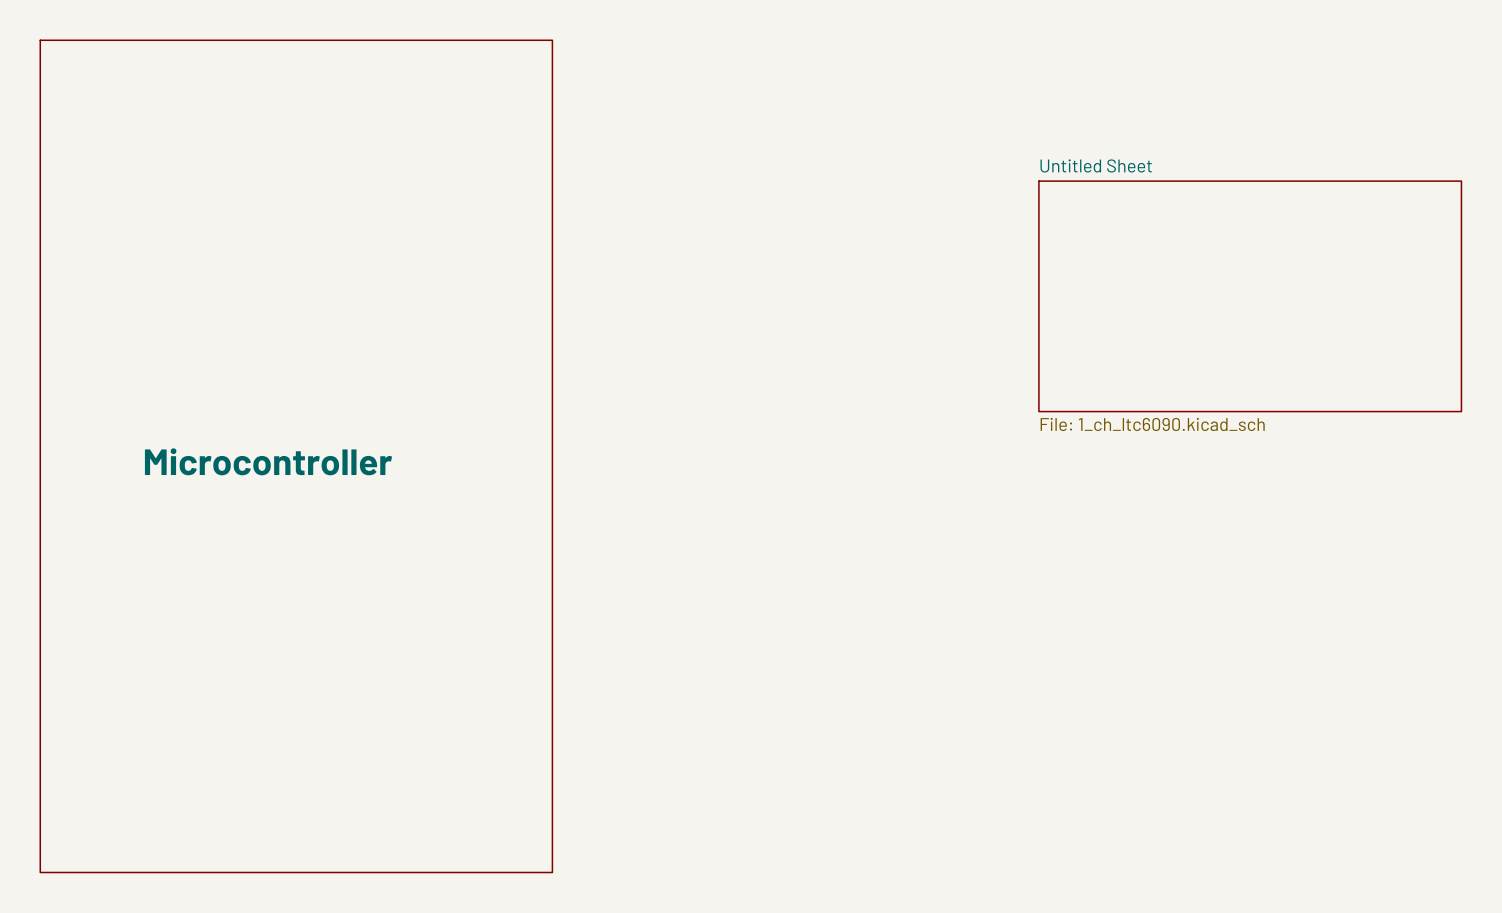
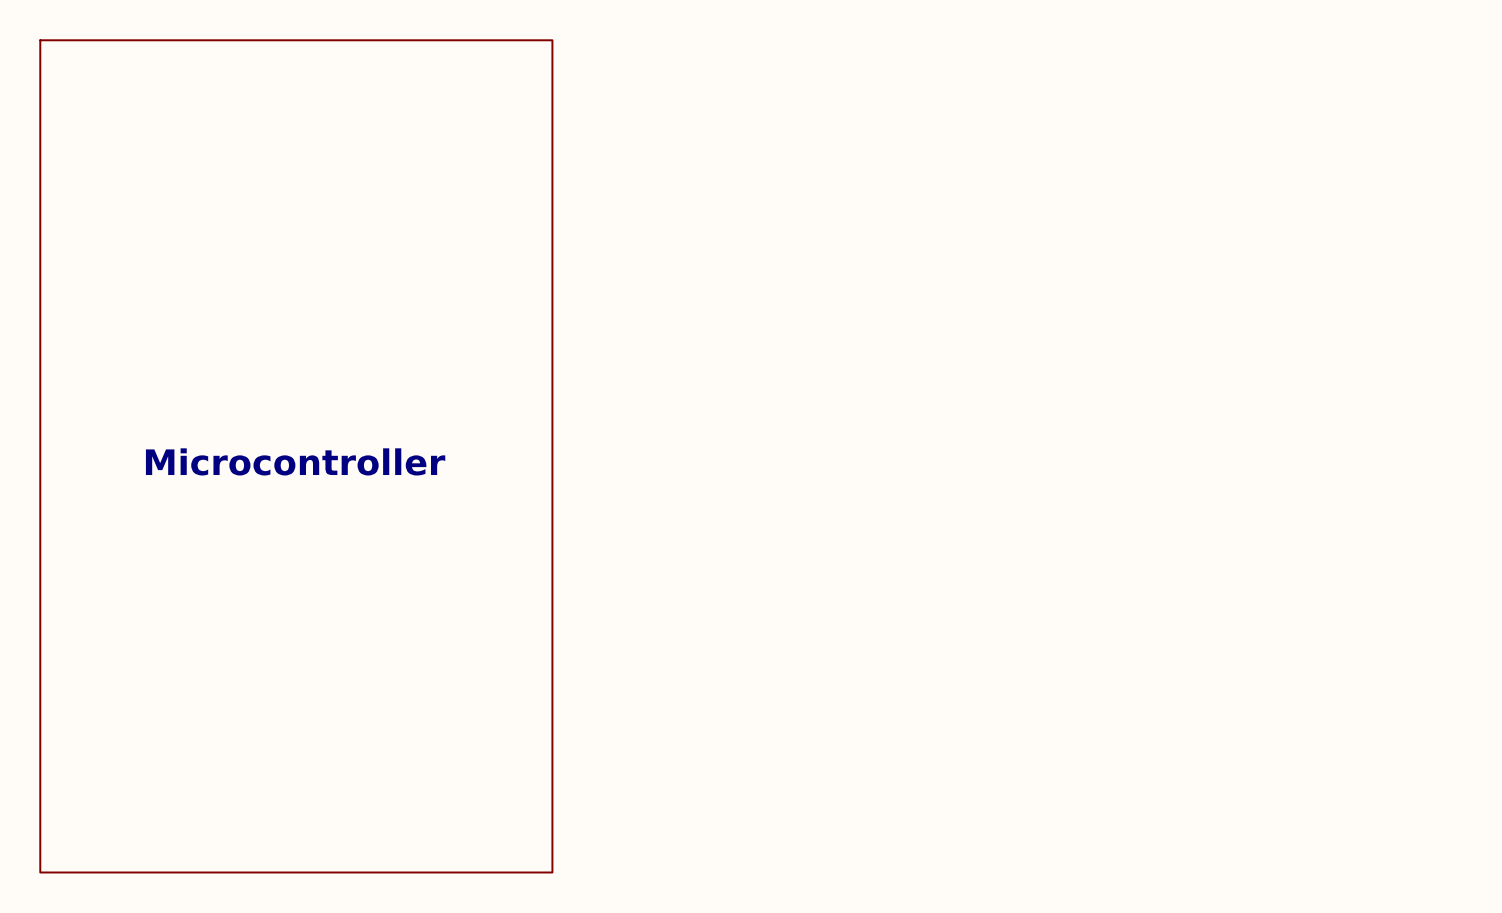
sheet Untitled Sheet: File: 1_ch_ltc6090.kicad_sch (1250, 296) -> none

